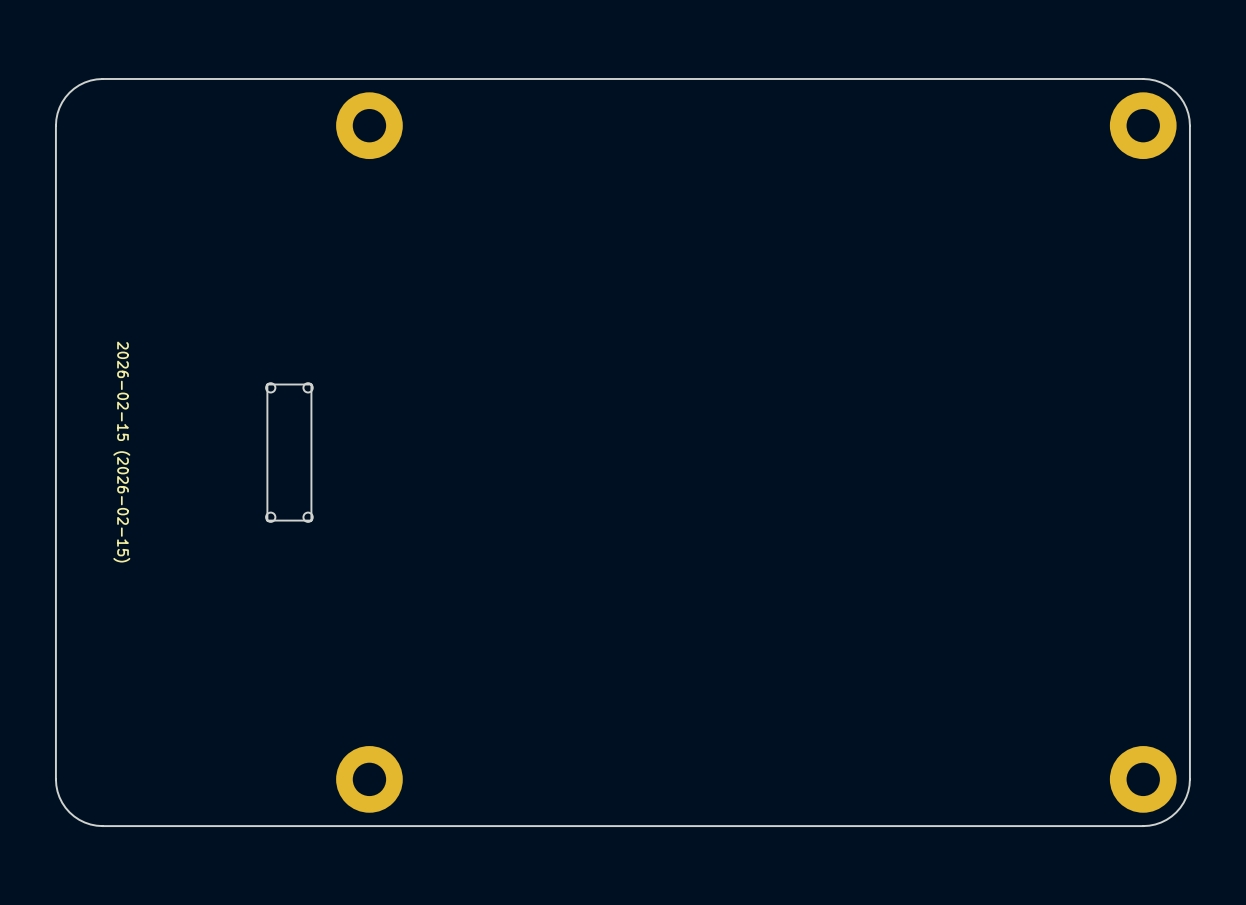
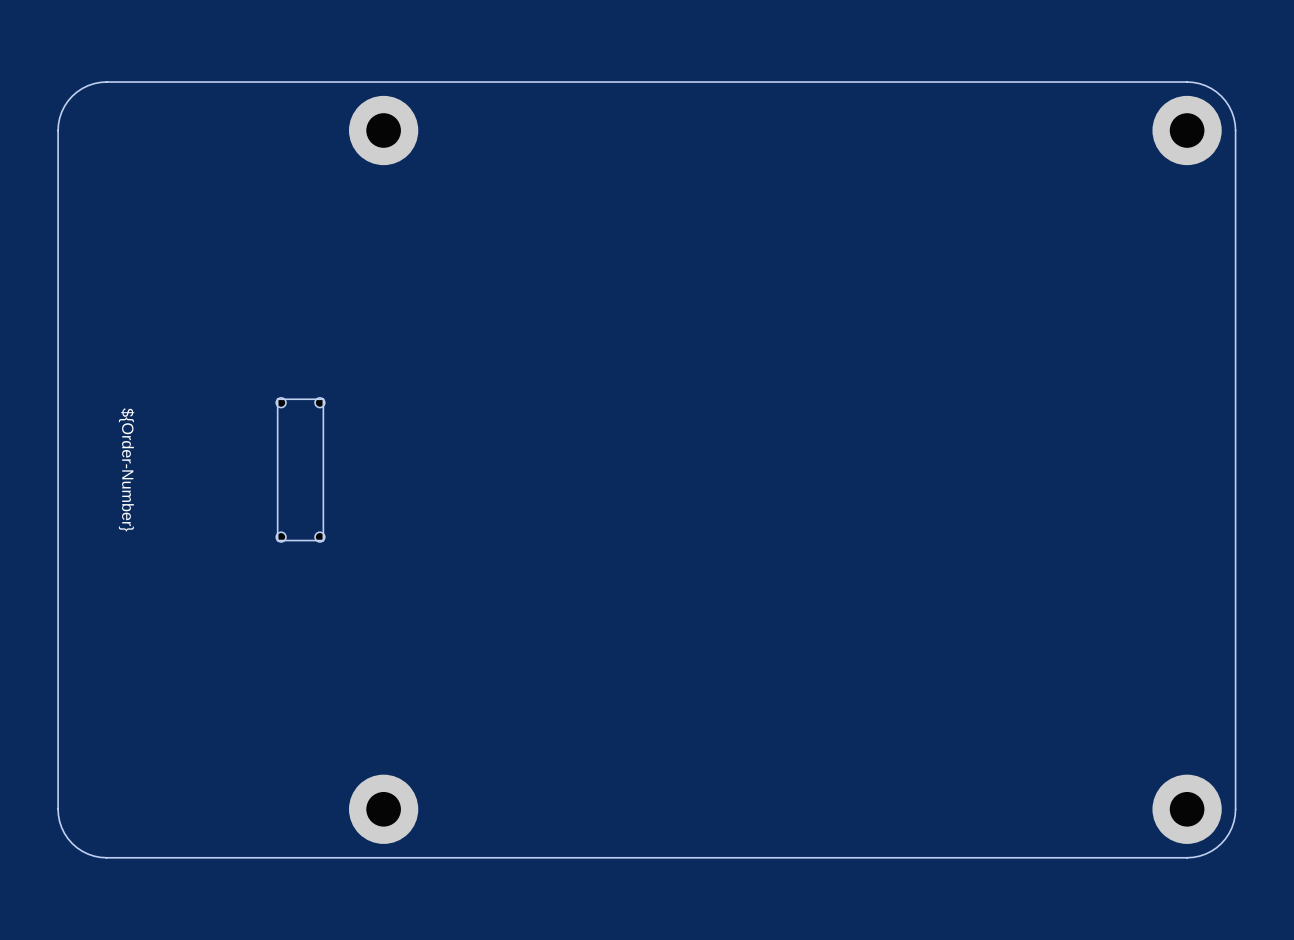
drawing shape: [113, 341, 131, 563] -> [118, 408, 135, 532]

